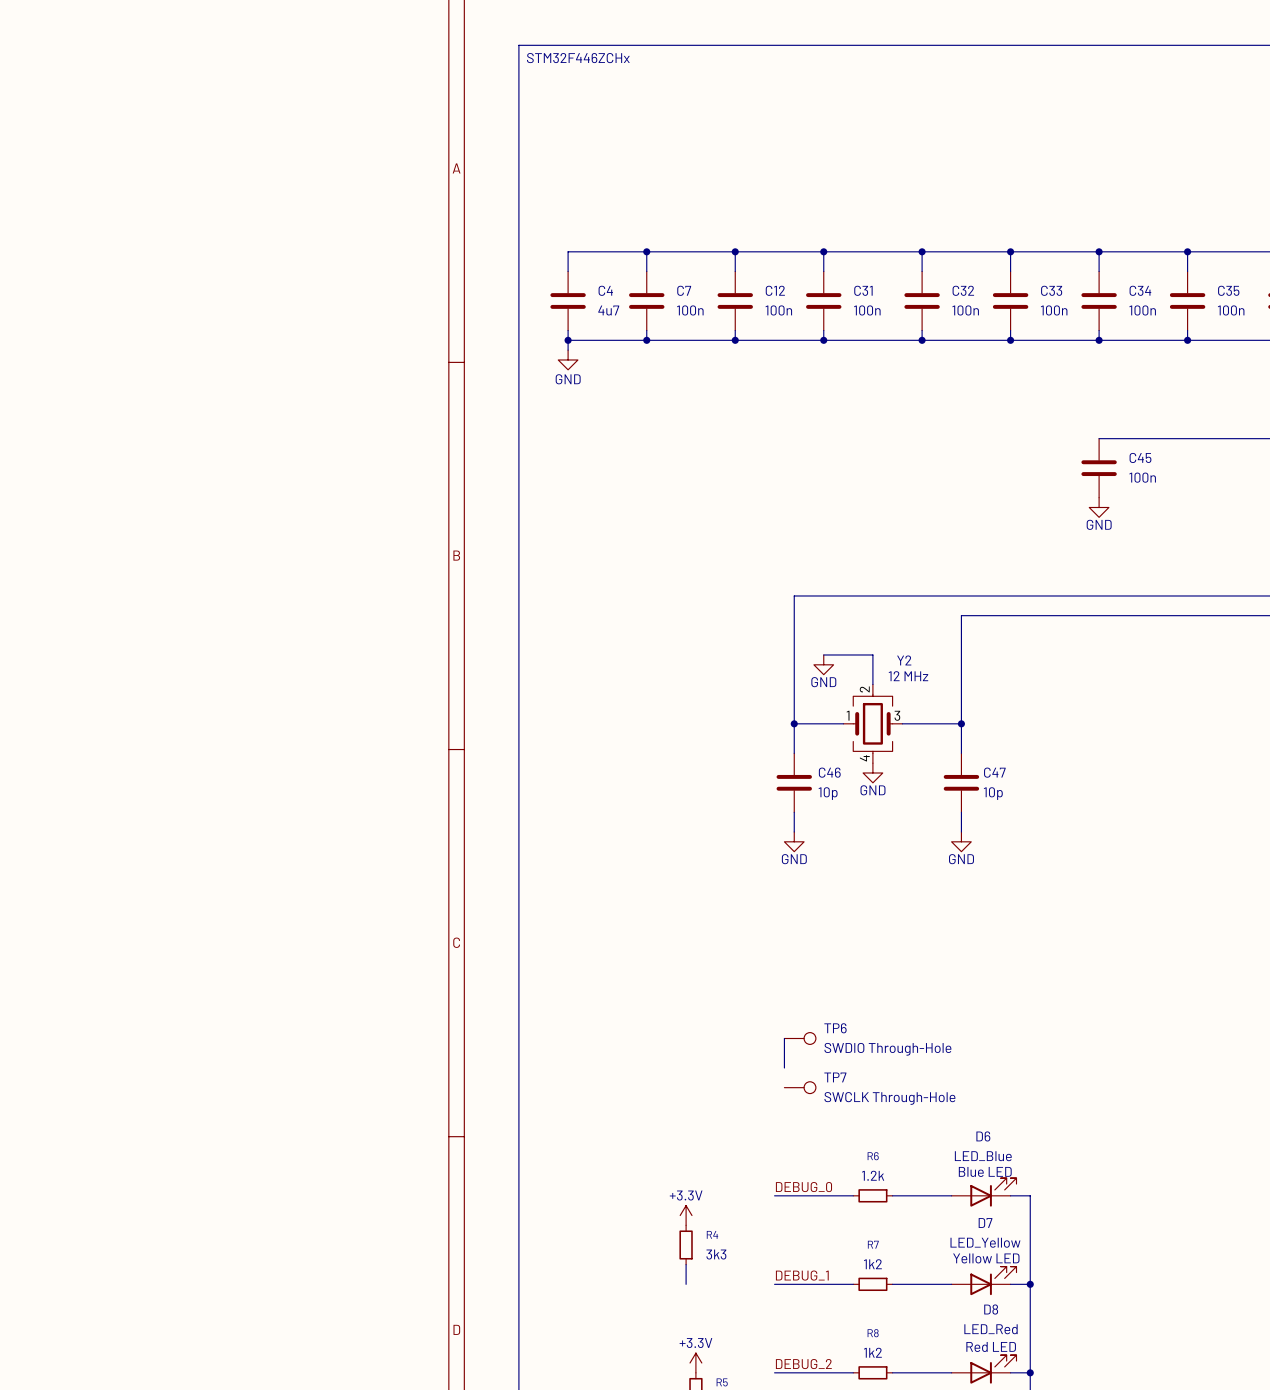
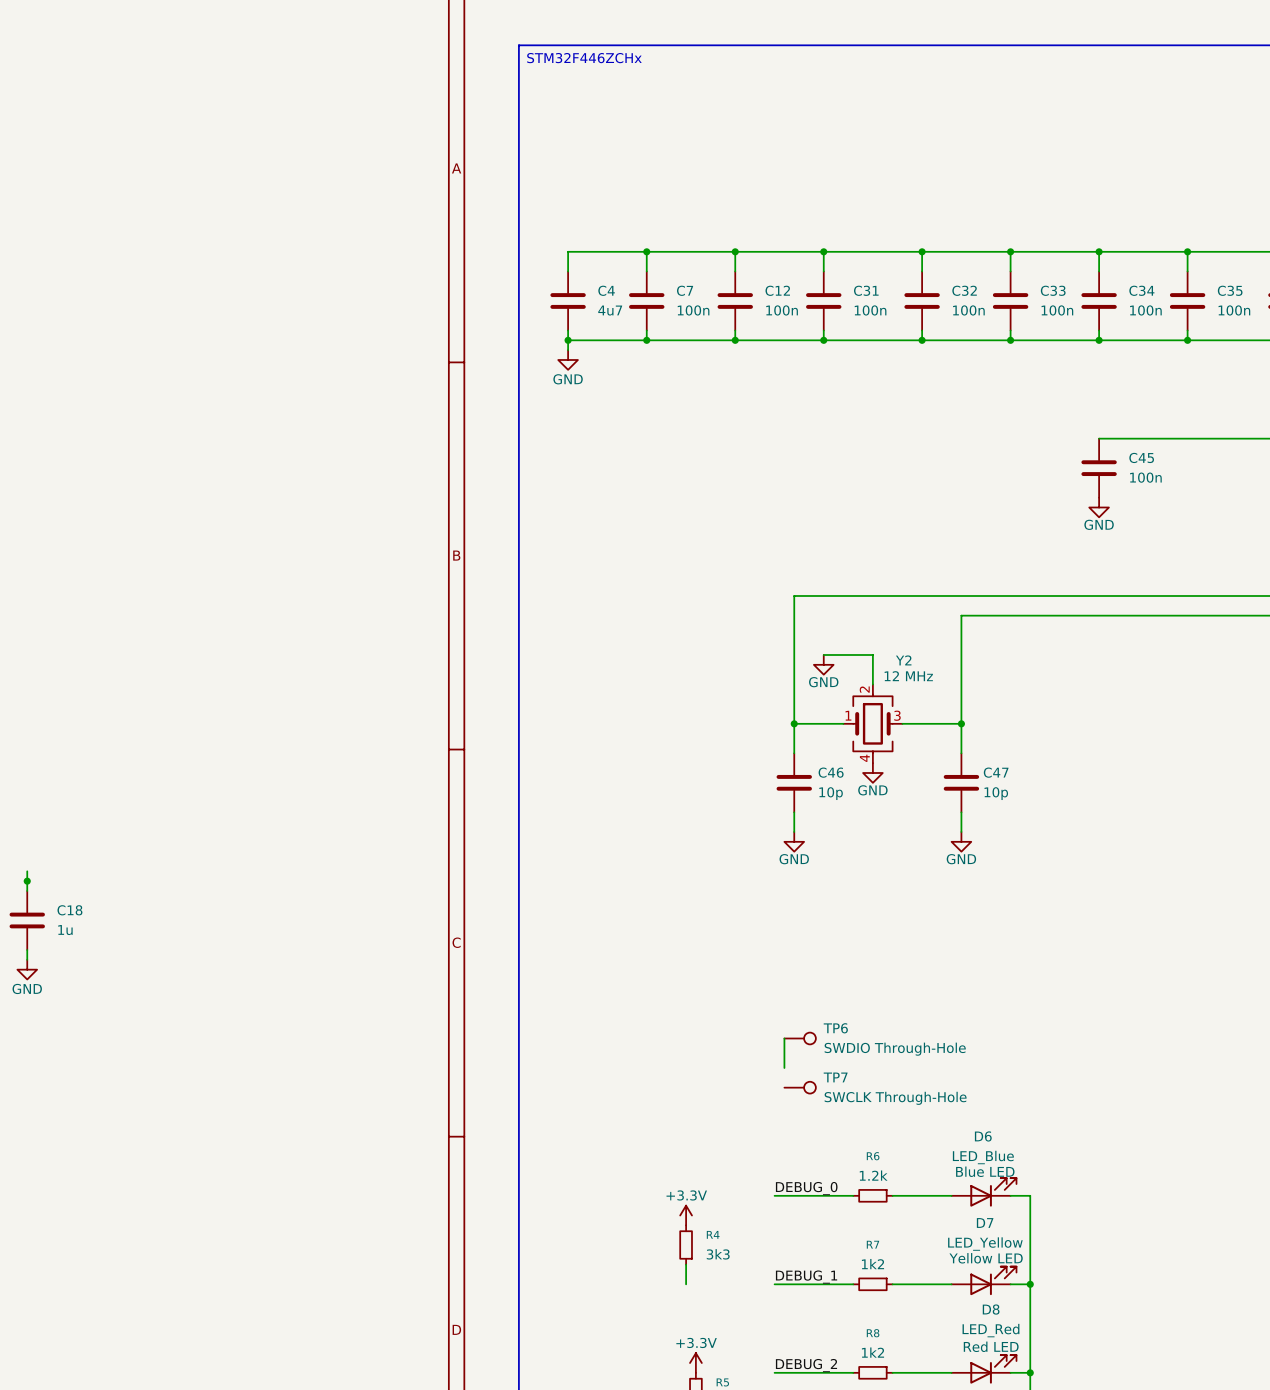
wire: none -> (27, 871) (27, 890)
junction: none -> (27, 881)
C18: none -> 1u (27, 920)
wire: none -> (27, 949) (27, 959)
power symbol: none -> GND (27, 969)

